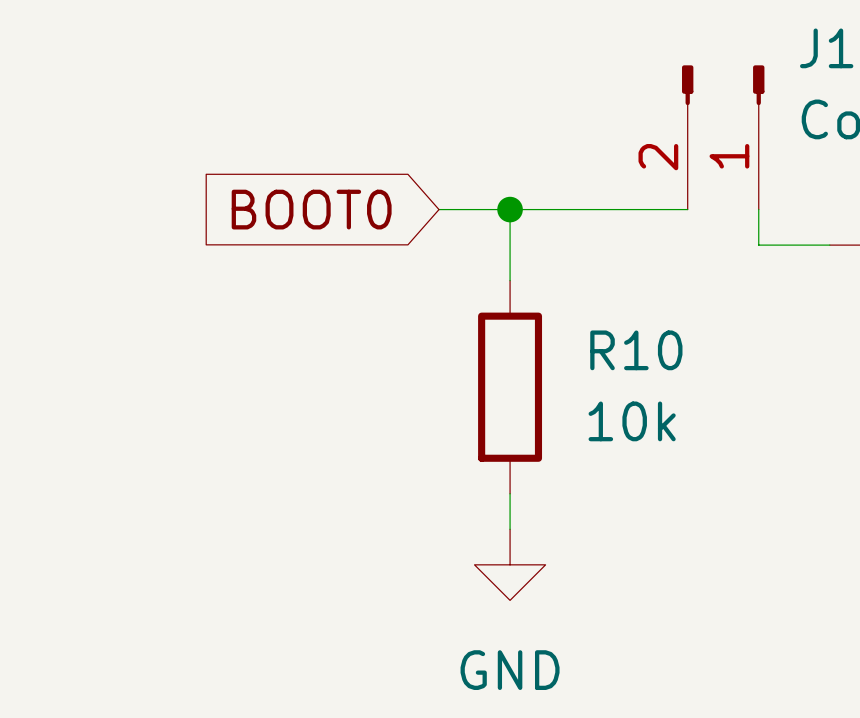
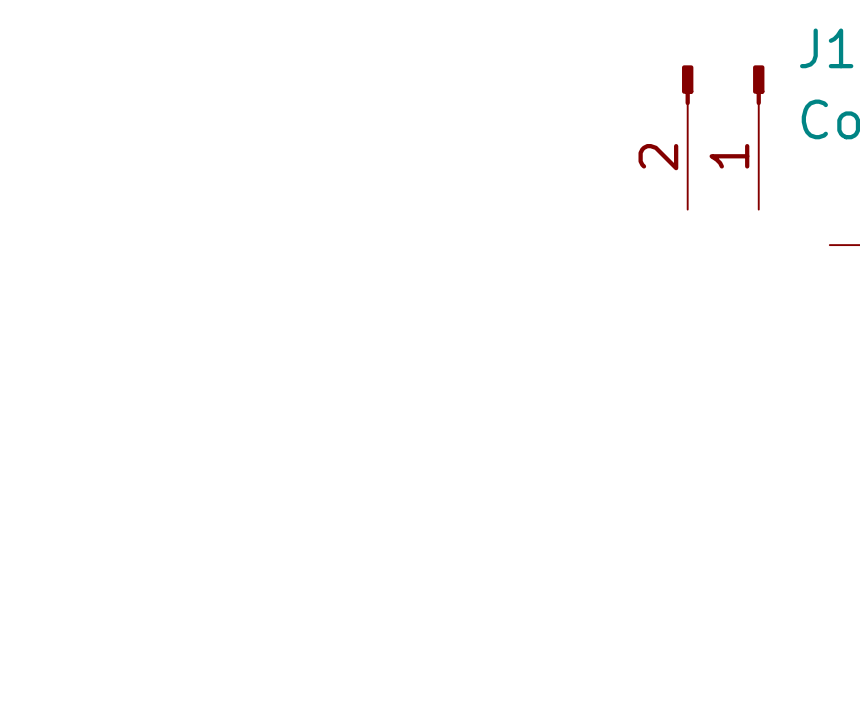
global label: BOOT0 (311, 209) -> none
wire: (439, 209) (687, 209) -> none
wire: (510, 209) (510, 280) -> none
junction: (510, 209) -> none
wire: (758, 209) (758, 245) (829, 245) -> none
R10: 10k (510, 387) -> none
wire: (510, 493) (510, 529) -> none
power symbol: GND (510, 564) -> none

